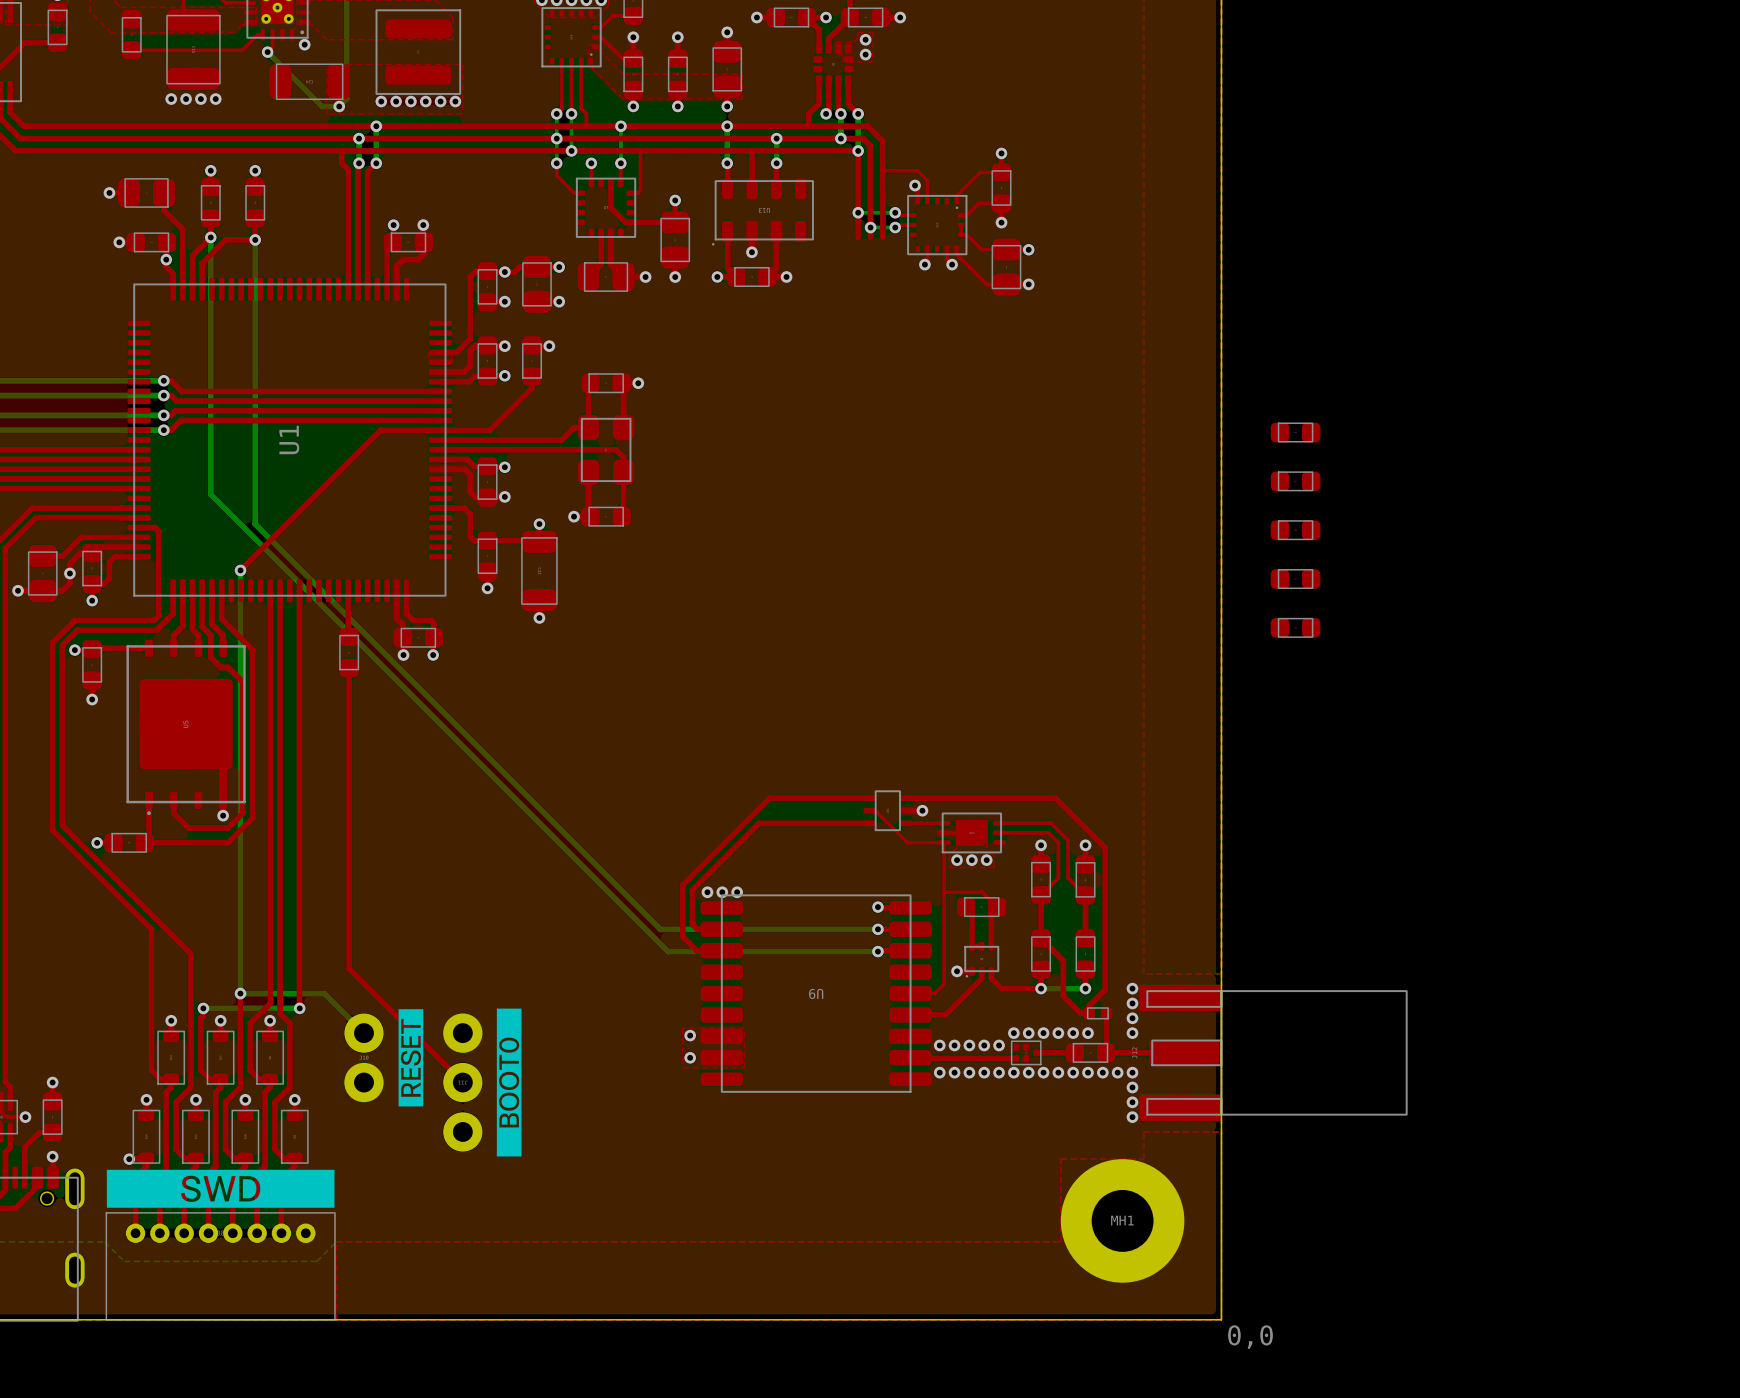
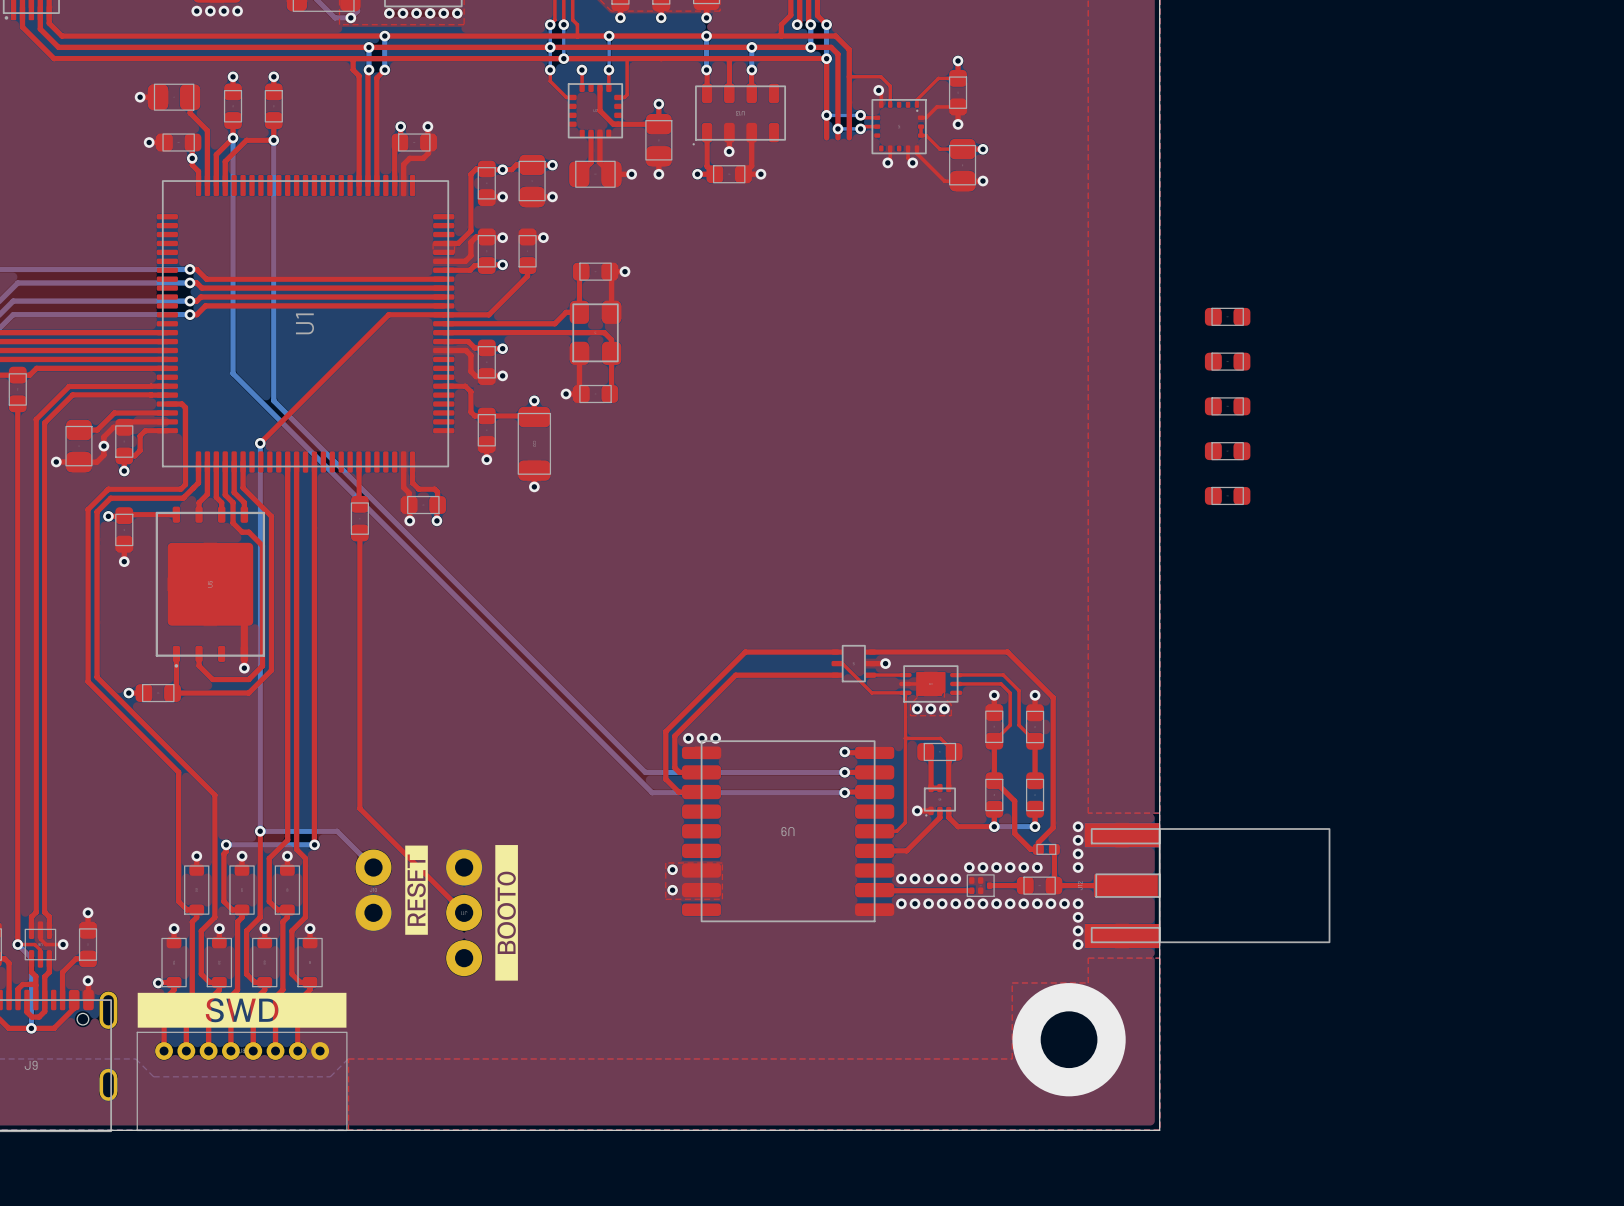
MH1: (1122, 1220) -> none
via: none -> (1069, 1039)
text: 0,0 (1250, 1337) -> none

